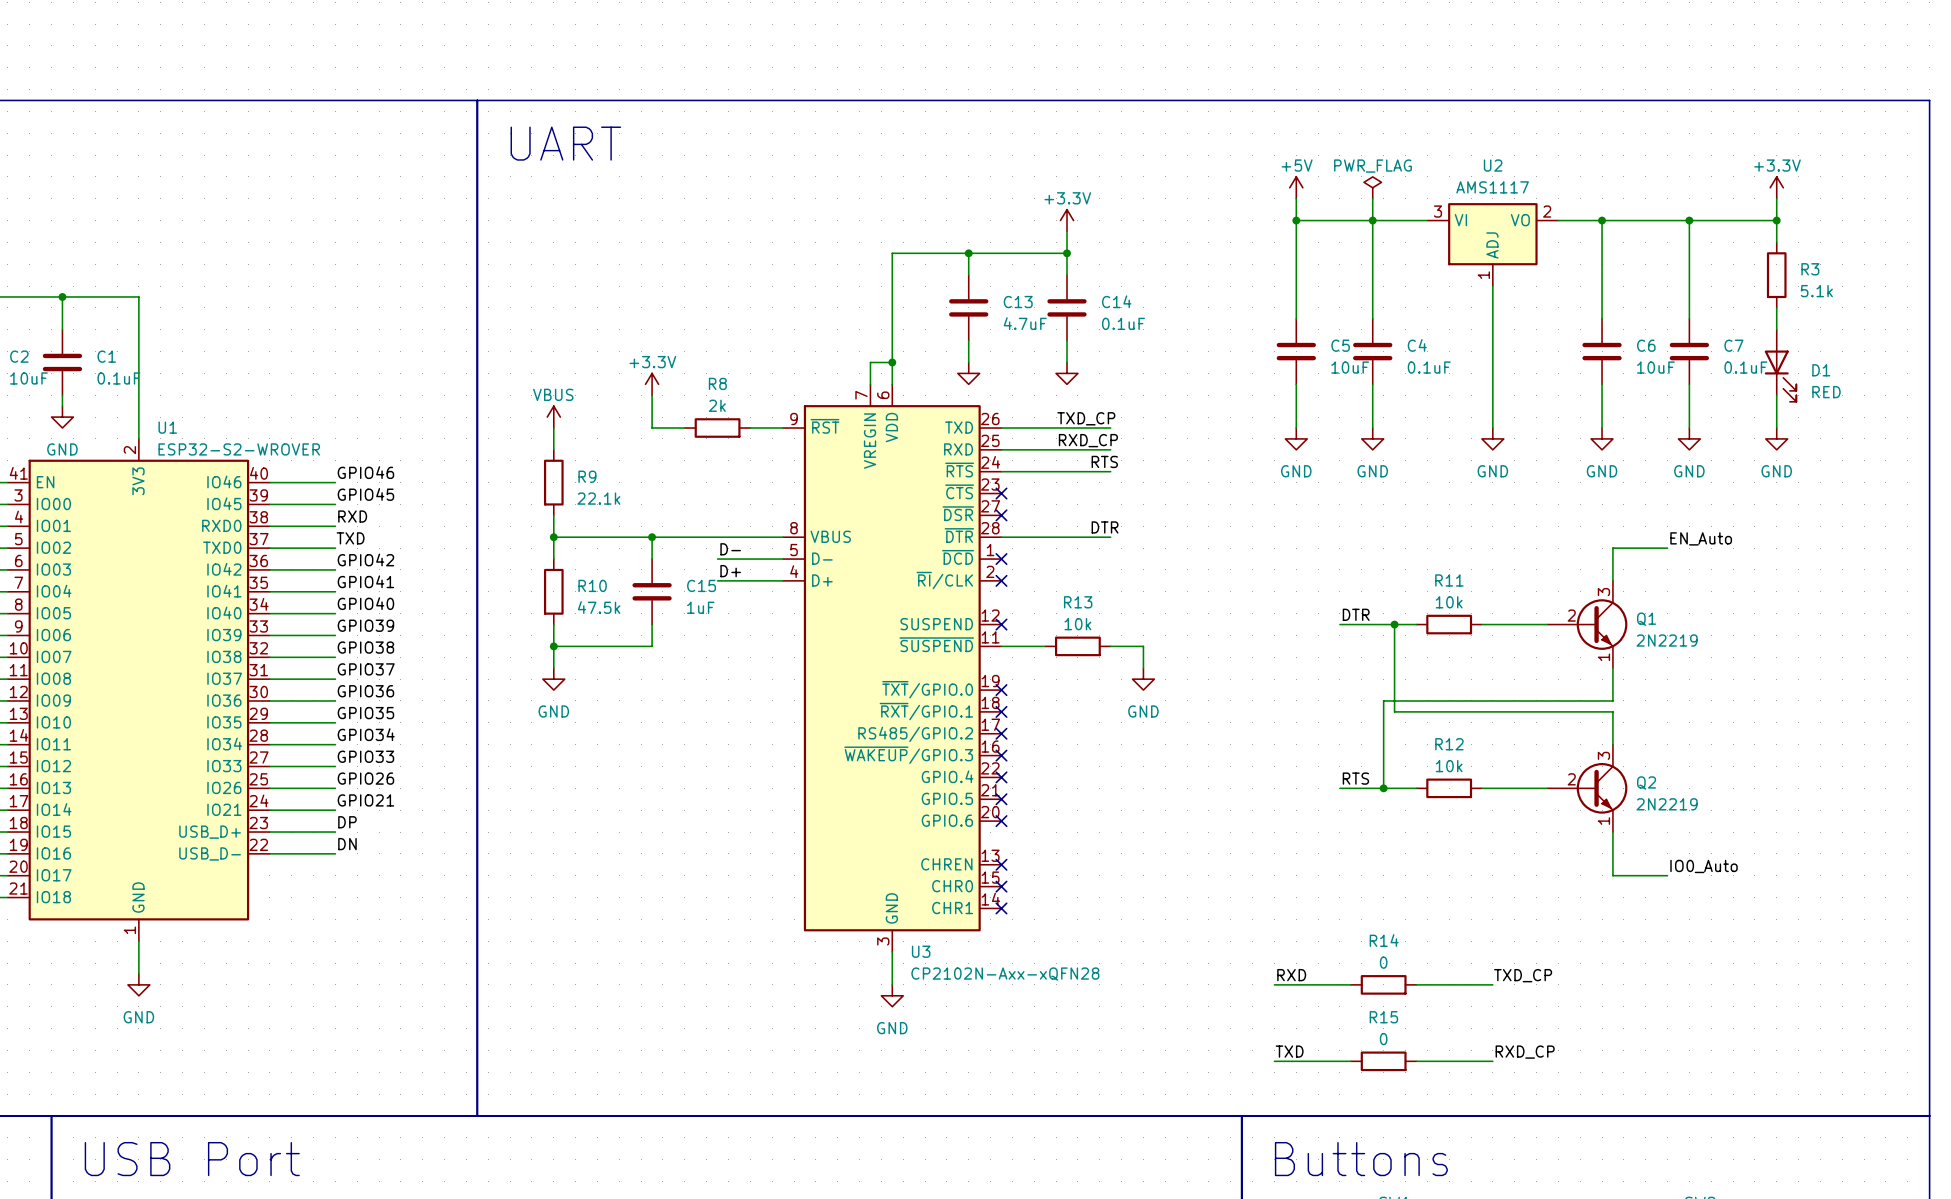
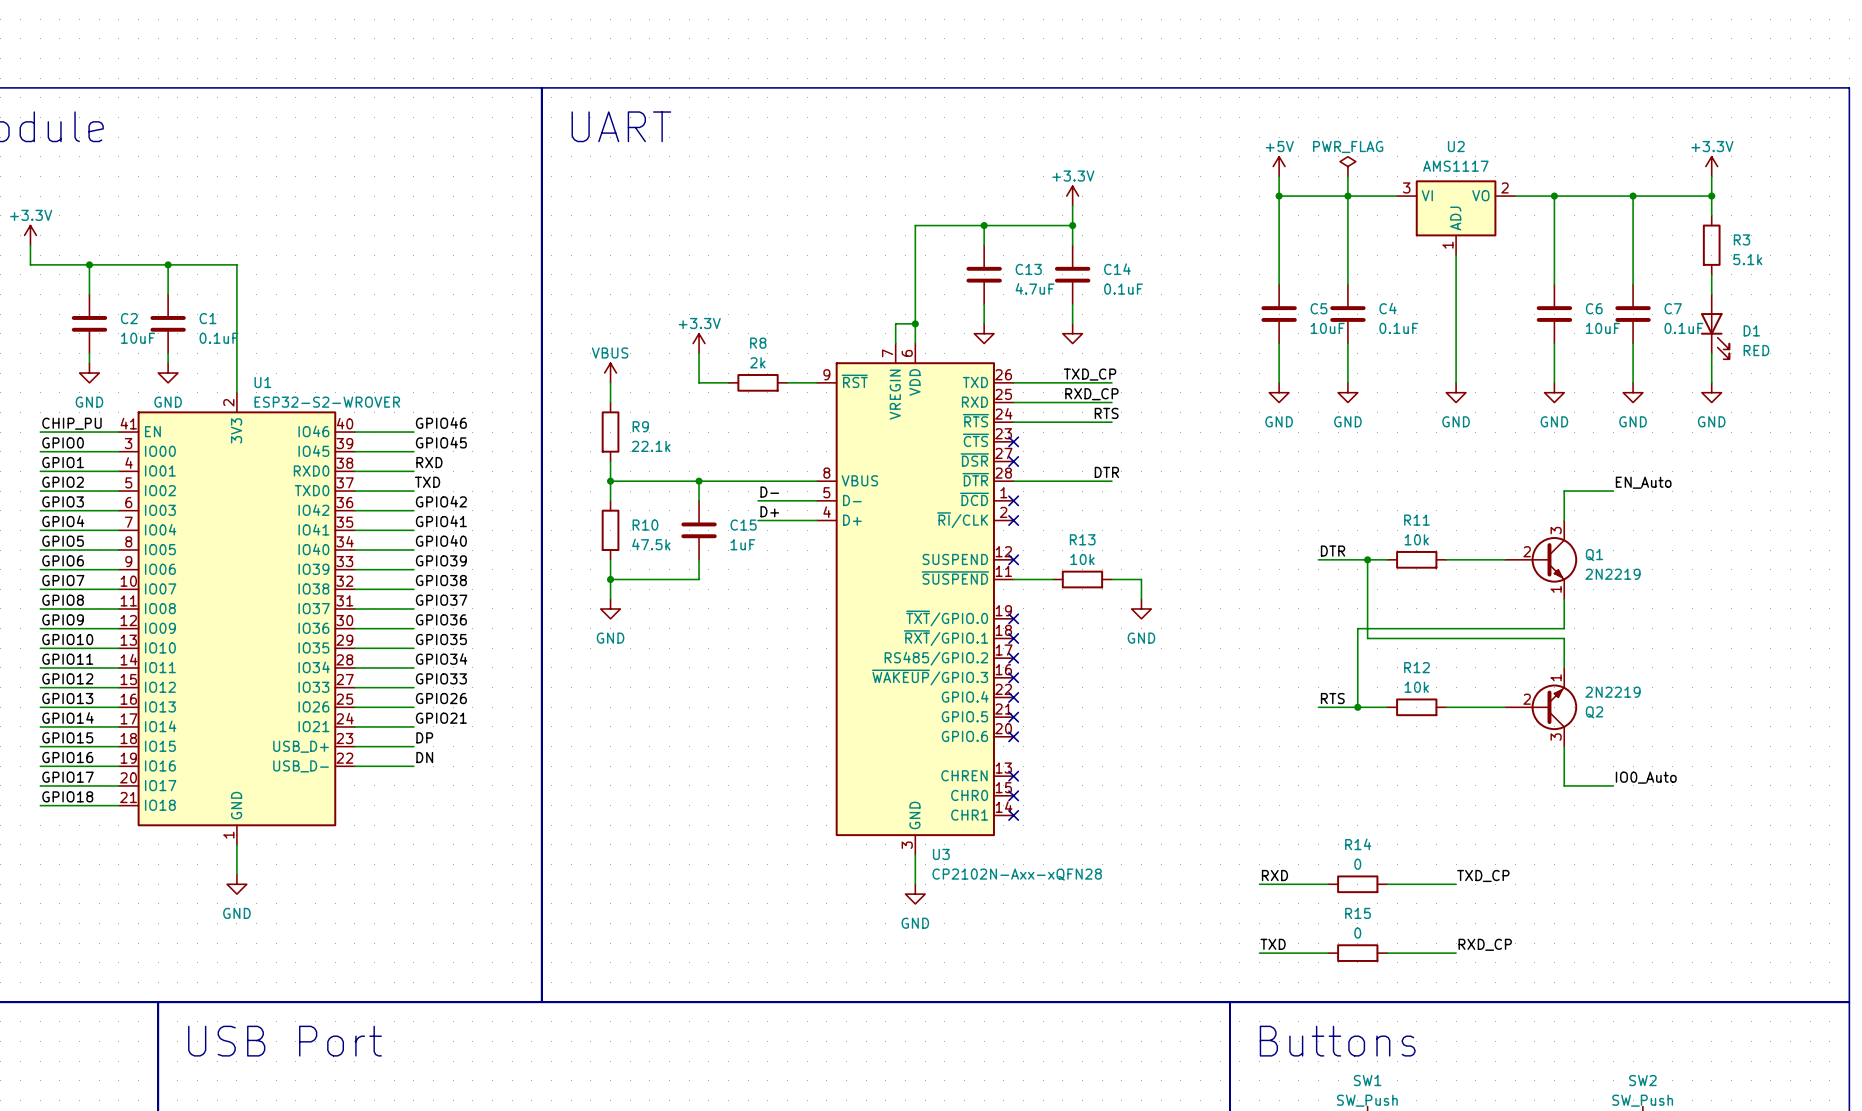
Q2 flip: as is (1602, 788) -> up-down (1554, 707)

